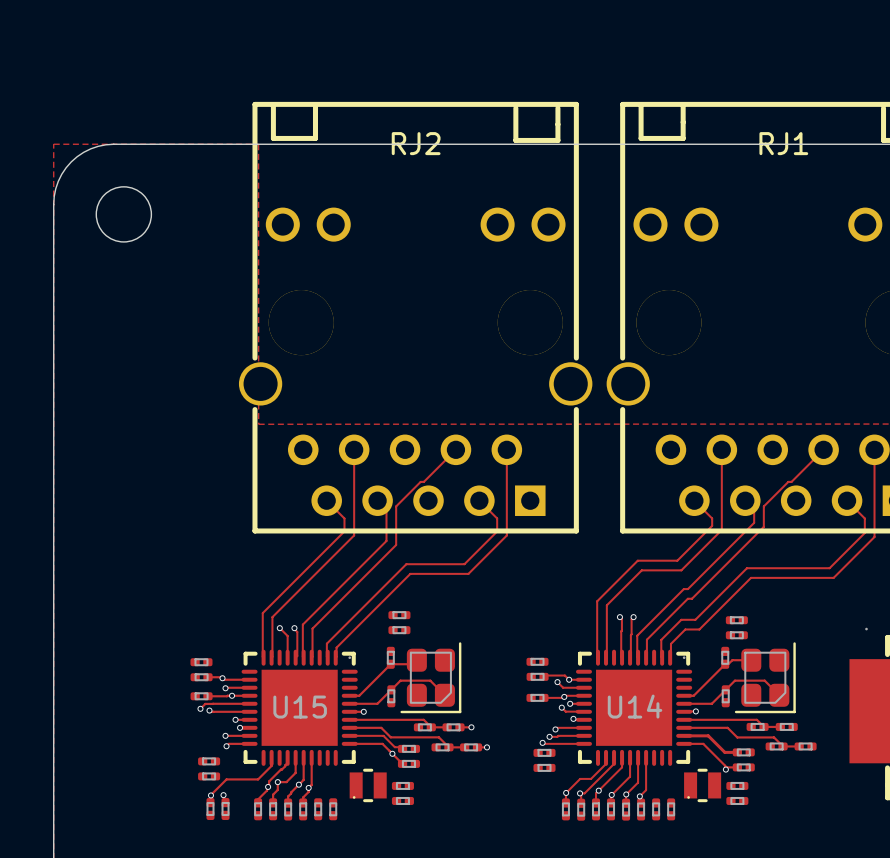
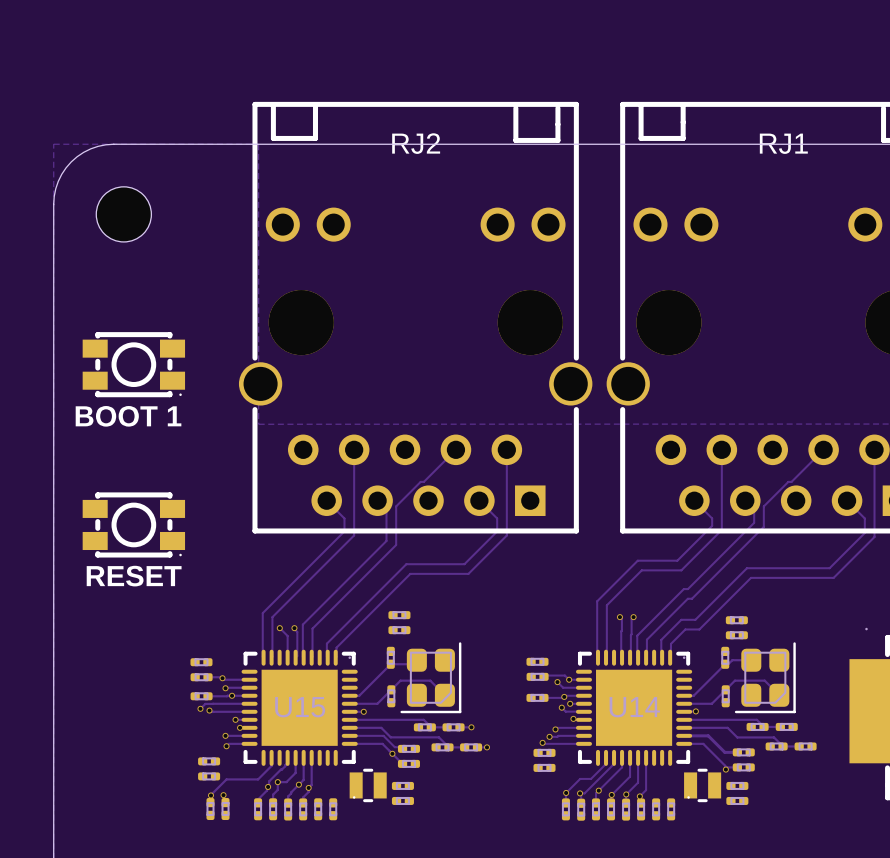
part: none -> (133, 364)
text: none -> BOOT 1 (128, 416)
part: none -> (133, 524)
text: none -> RESET (134, 576)

